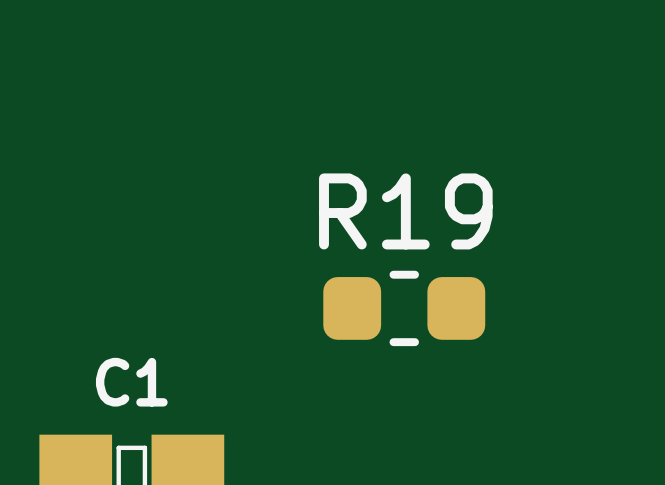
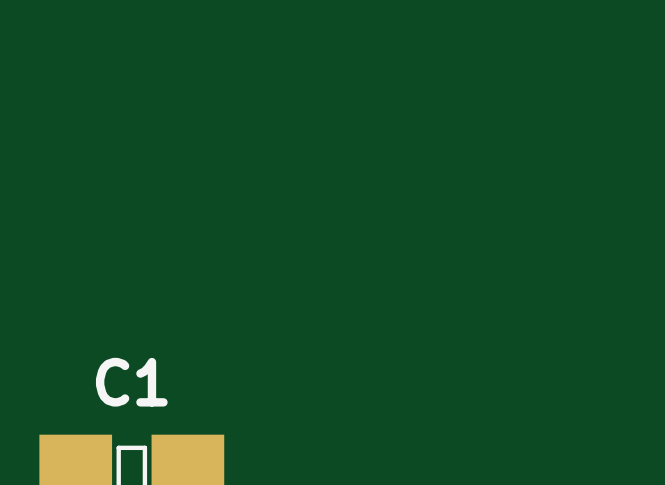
R19: (404, 308) -> none

